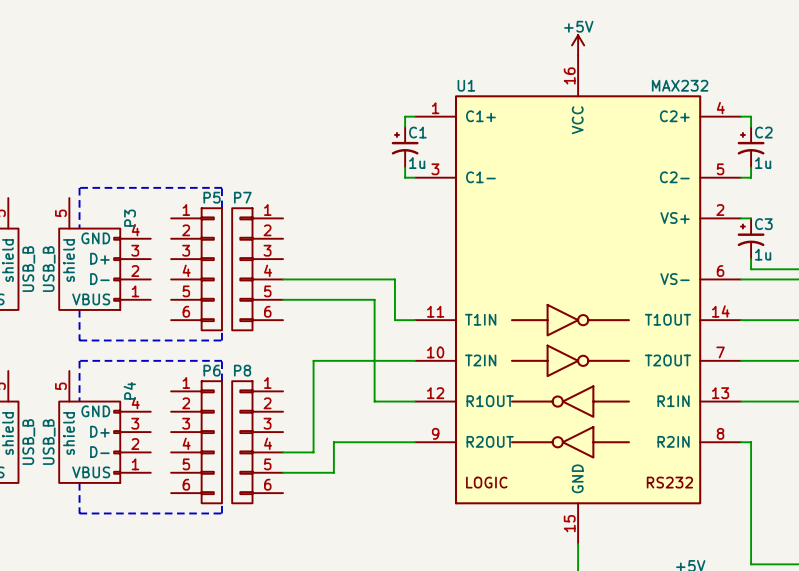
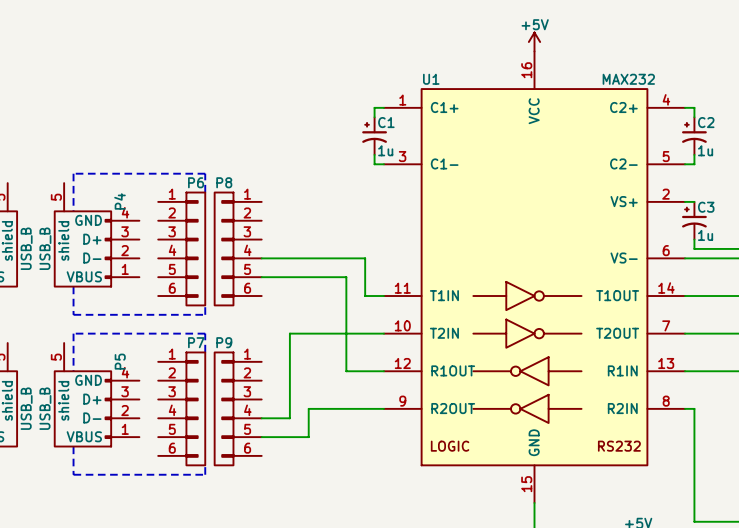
P5 name: P5 (212, 197) -> P6 (196, 182)
P7 name: P7 (242, 197) -> P8 (224, 182)
P3 name: P3 (130, 218) -> P4 (120, 201)
P6 name: P6 (212, 370) -> P7 (196, 342)
P8 name: P8 (242, 370) -> P9 (224, 342)
P4 name: P4 (129, 390) -> P5 (120, 361)

